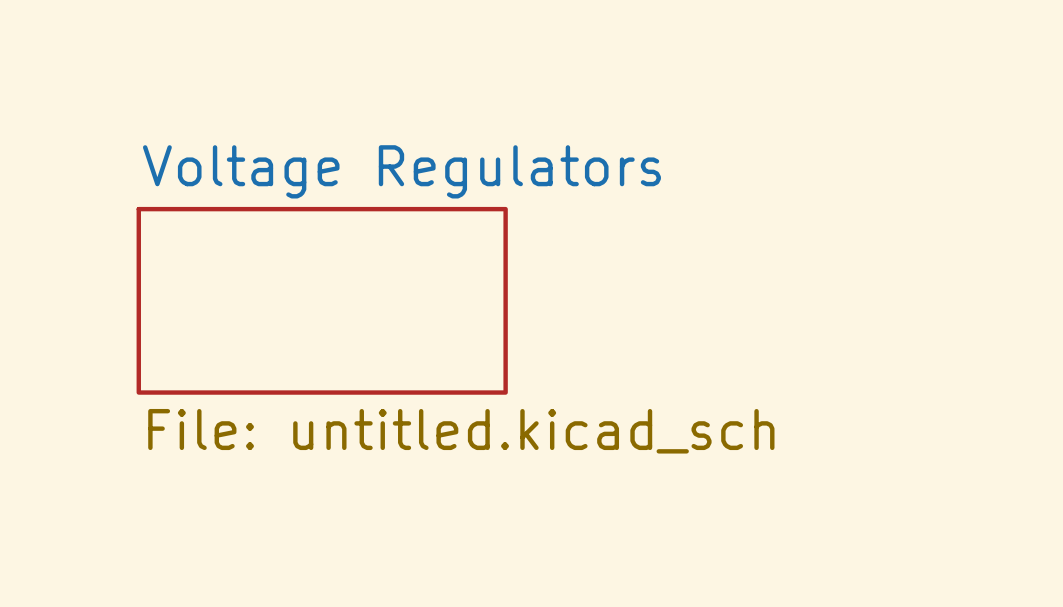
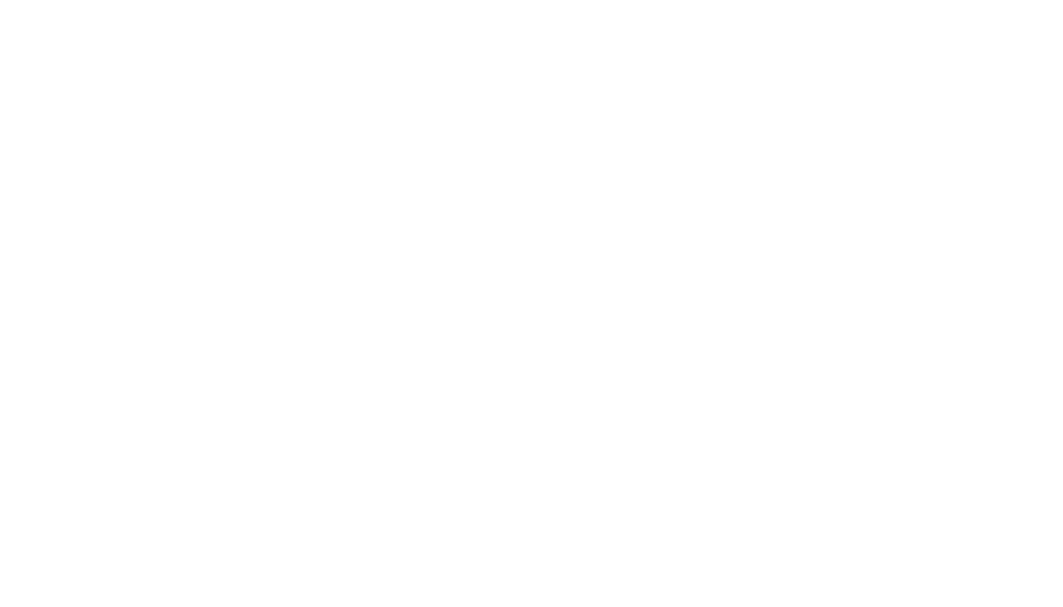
sheet Voltage Regulators: File: untitled.kicad_sch (322, 300) -> none

